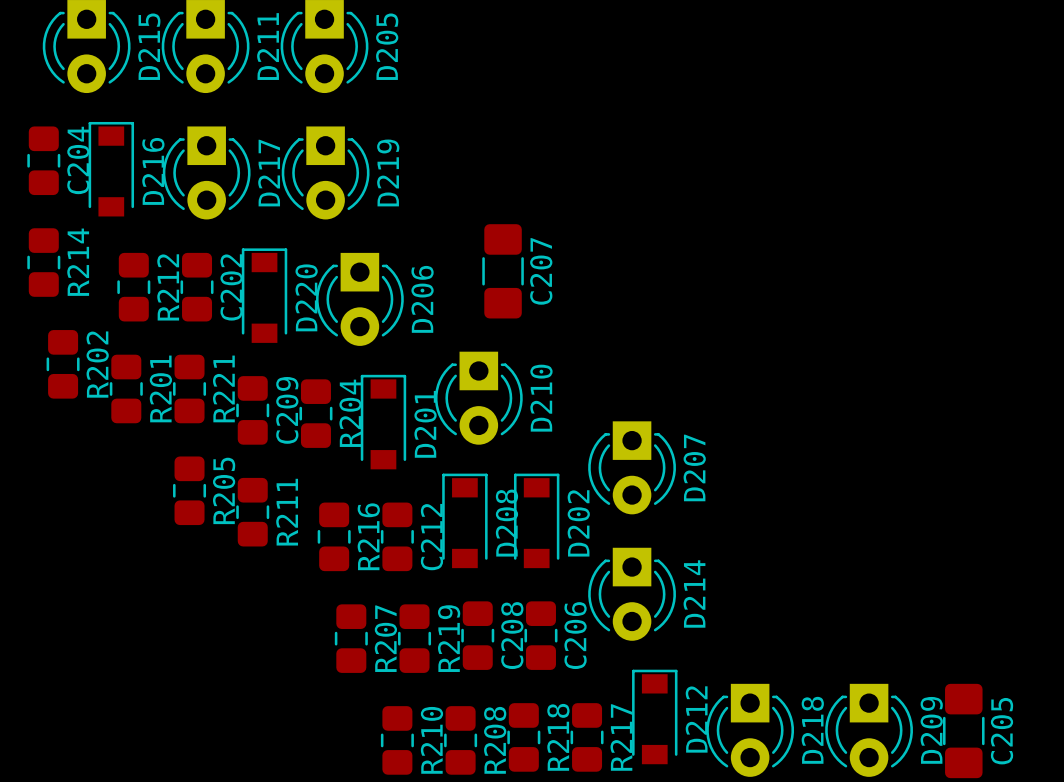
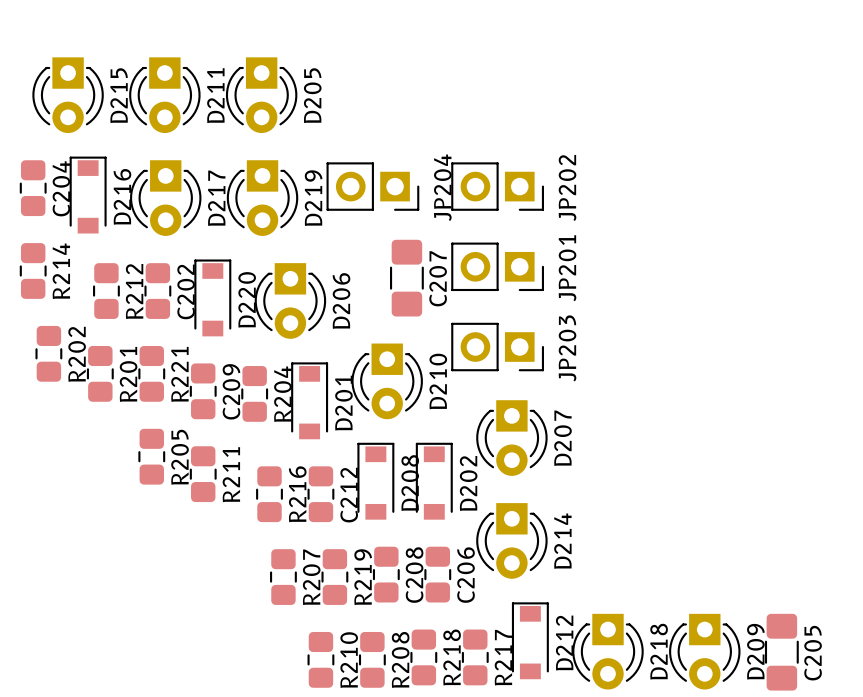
JP204: none -> (372, 186)
JP202: none -> (497, 186)
JP201: none -> (497, 266)
JP203: none -> (497, 347)

